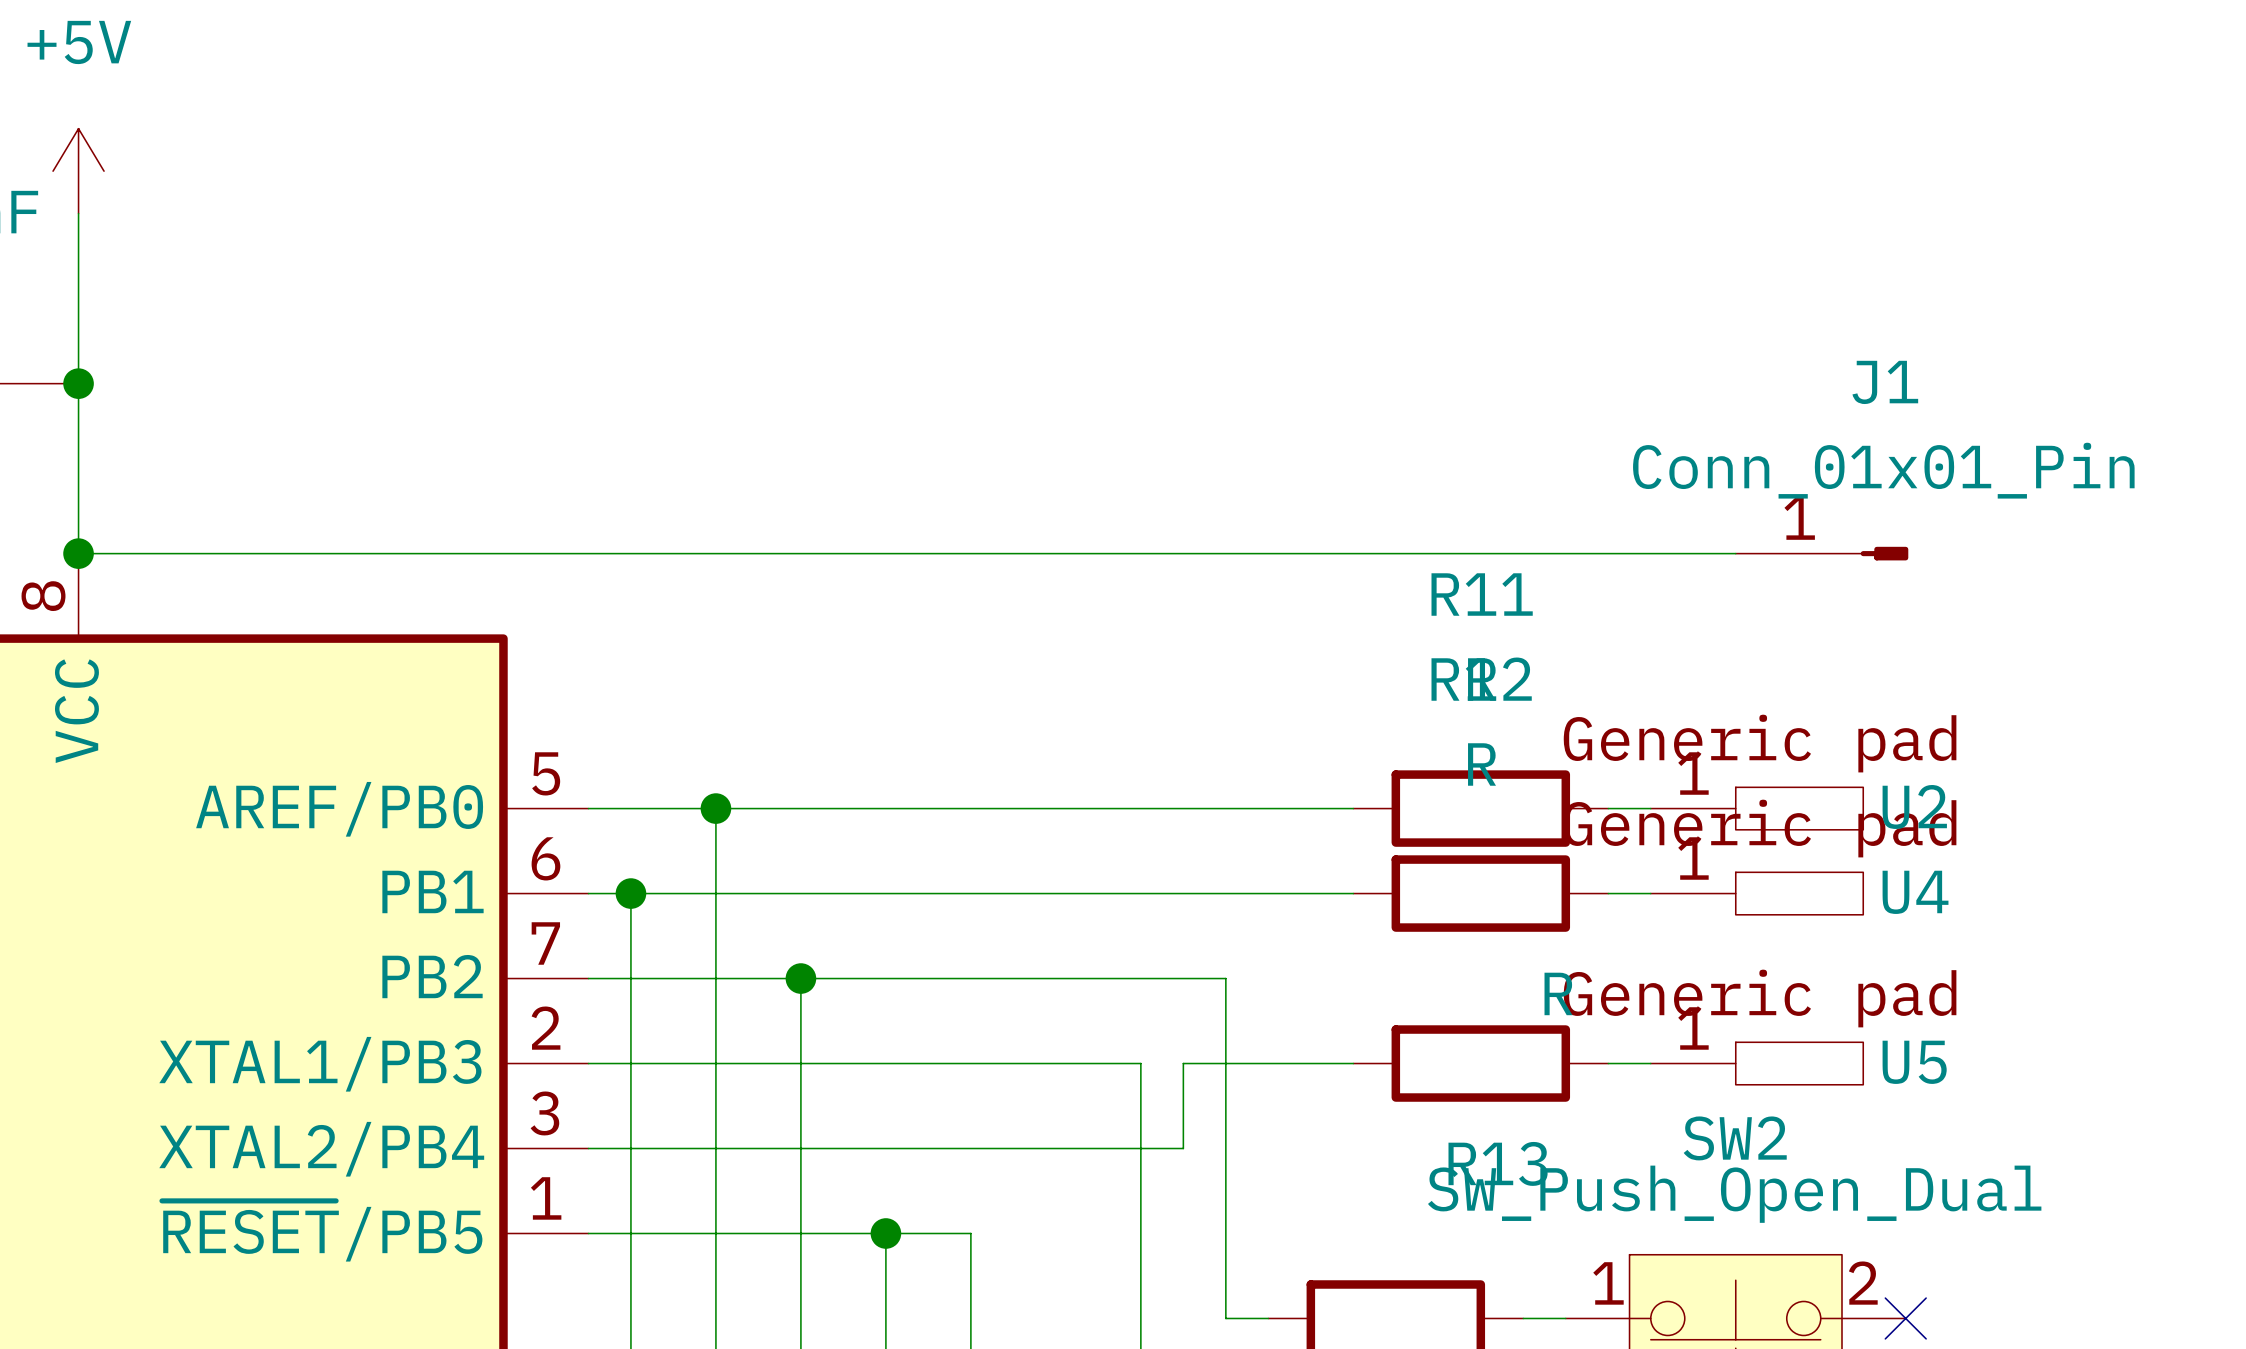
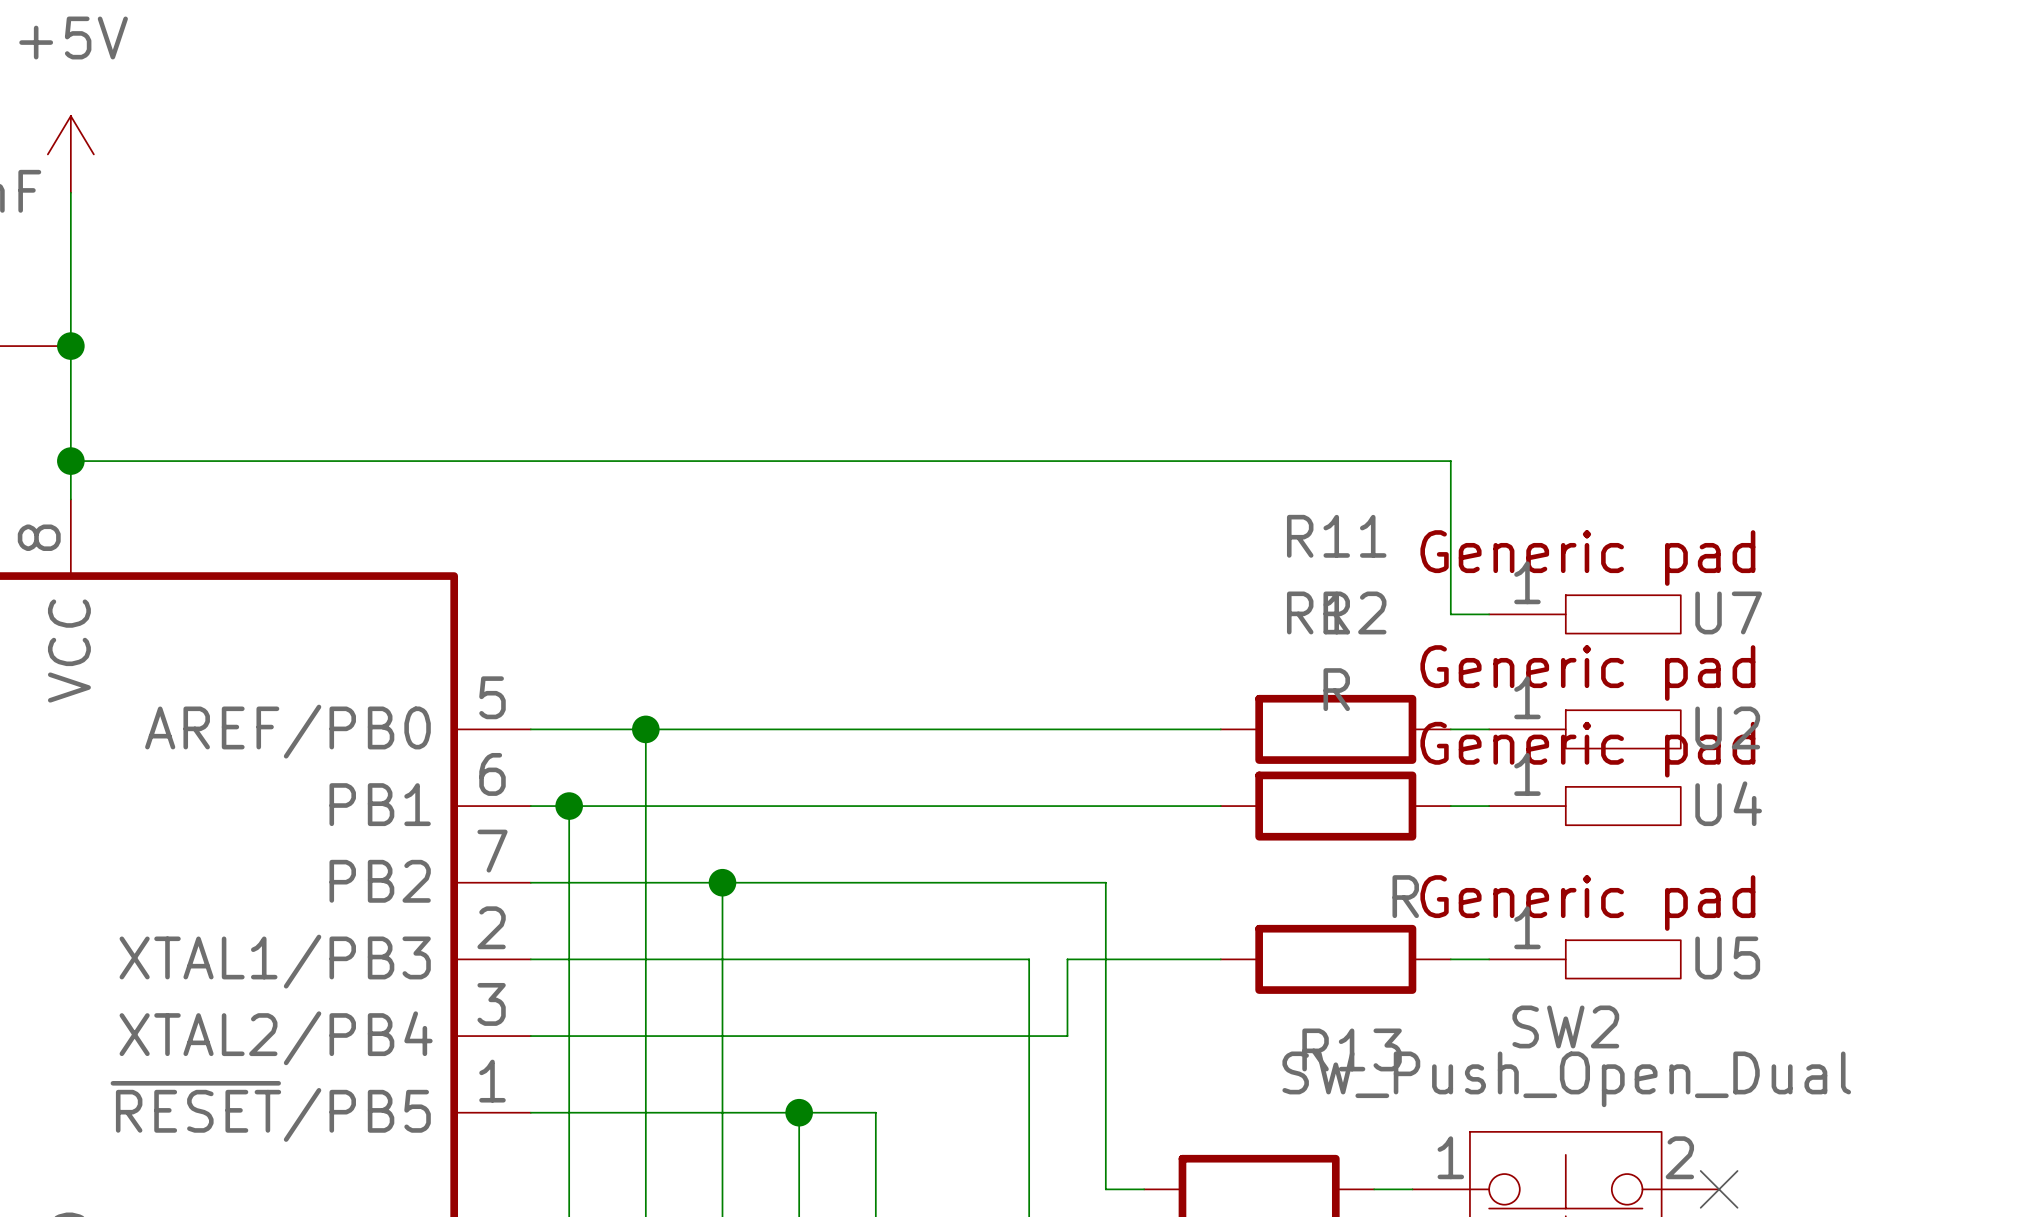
wire: none -> (70, 461) (1450, 461) (1450, 614) (1489, 614)
wire: (78, 553) (1735, 553) -> none
junction position: (78, 553) -> (70, 461)
J1: Conn_01x01_Pin (1822, 553) -> none
U7: none -> (1584, 614)

